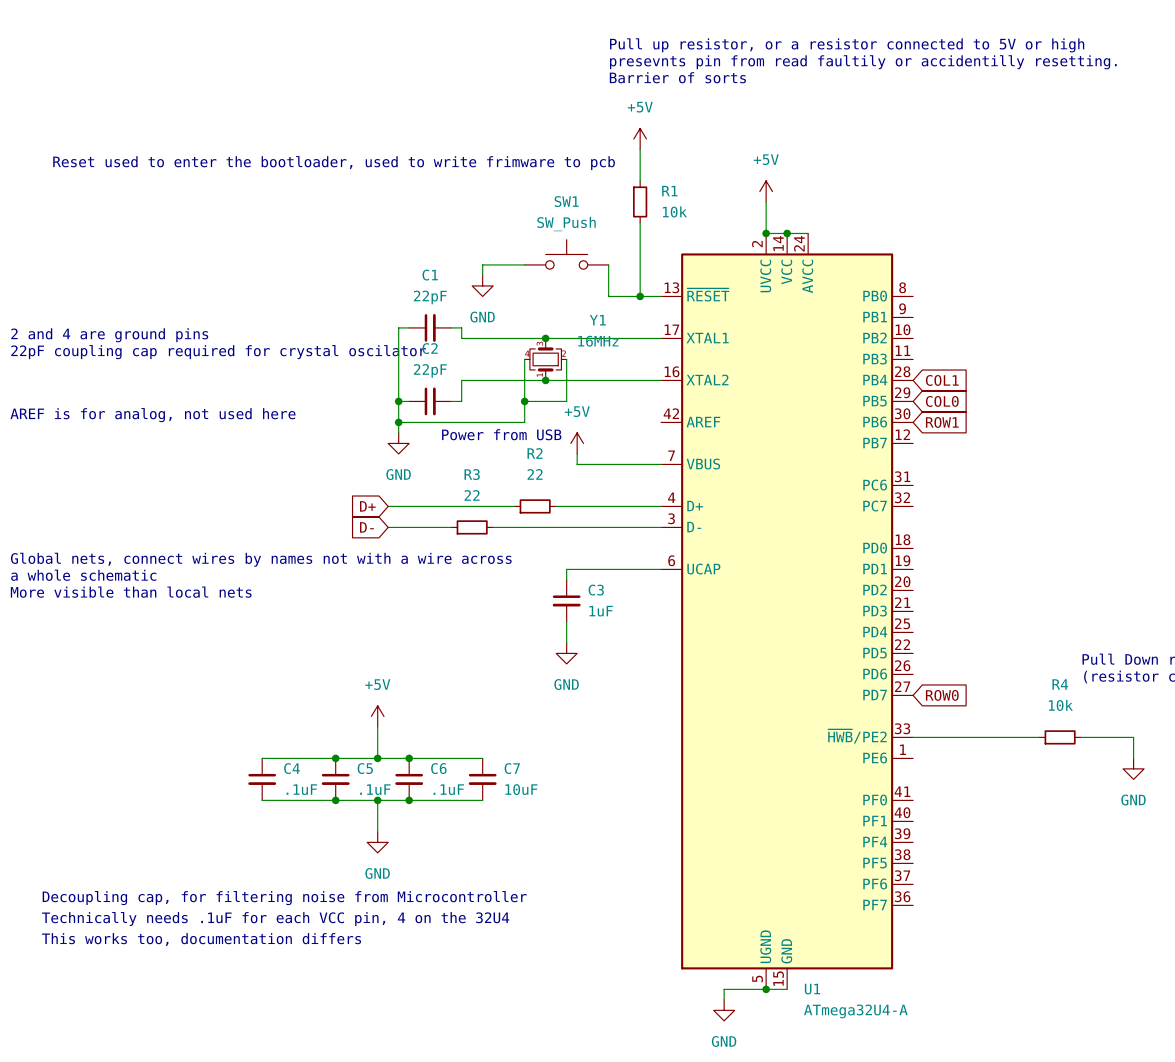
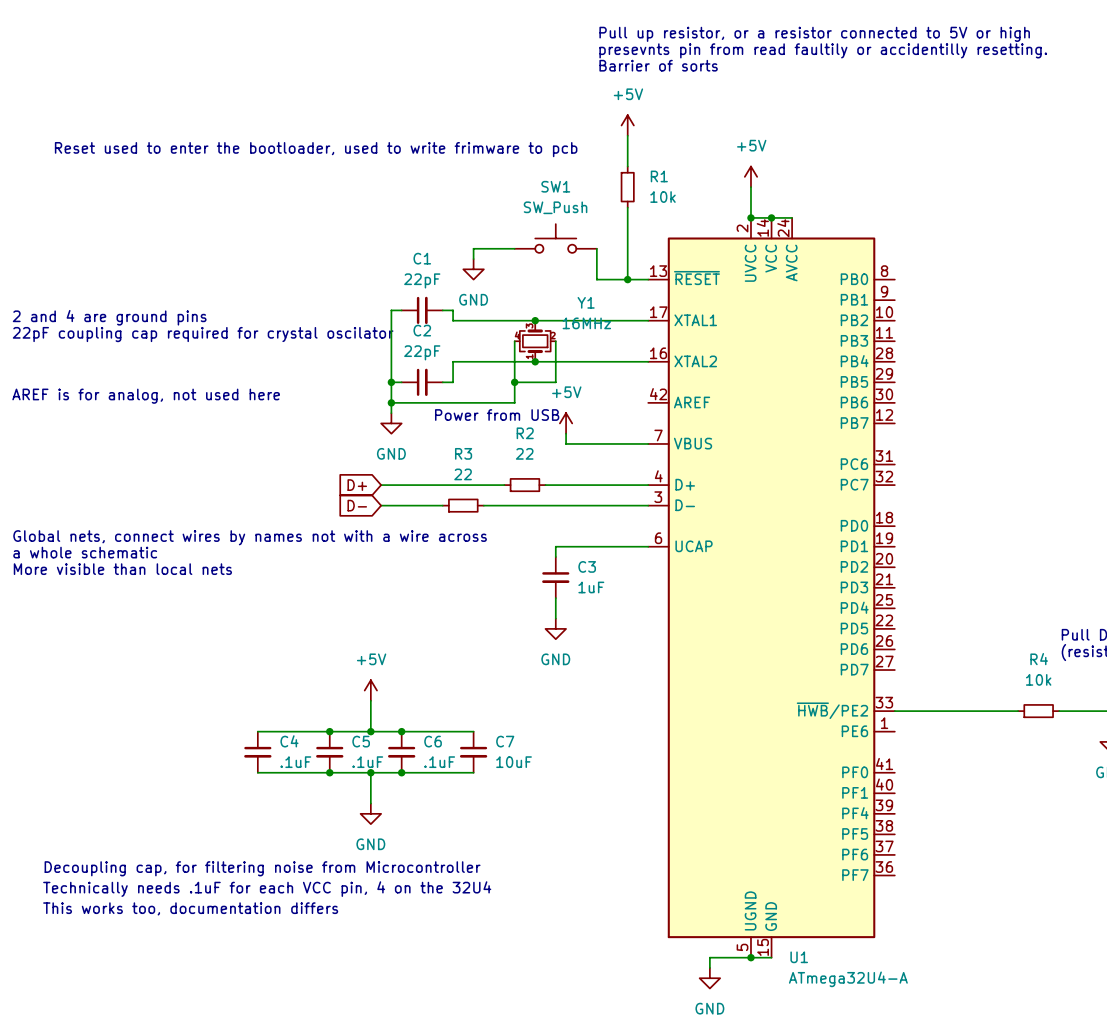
global label: COL1 (942, 380) -> none
global label: COL0 (942, 401) -> none
global label: ROW1 (942, 422) -> none
global label: ROW0 (942, 695) -> none

